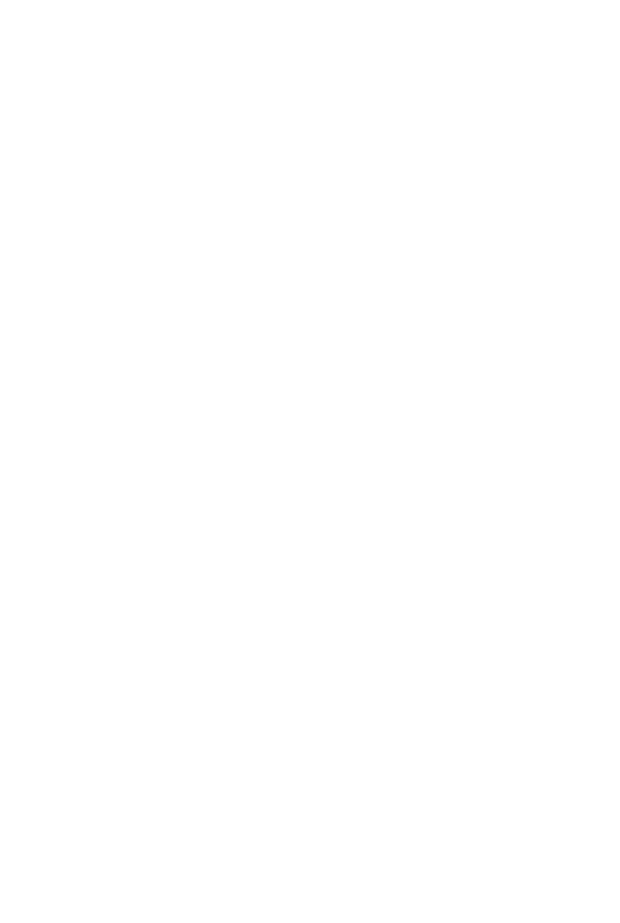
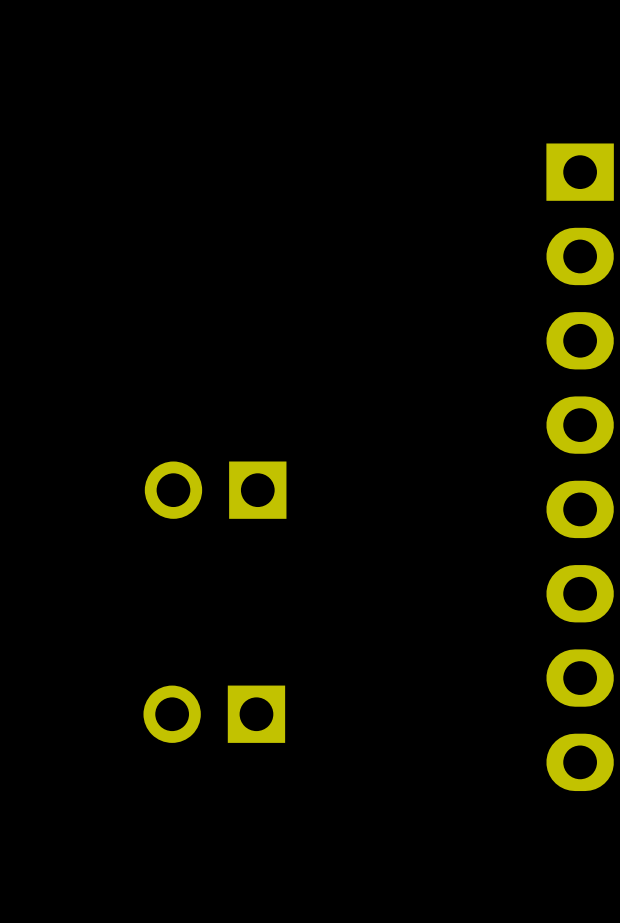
part: none -> (580, 467)
part: none -> (215, 490)
part: none -> (214, 714)

